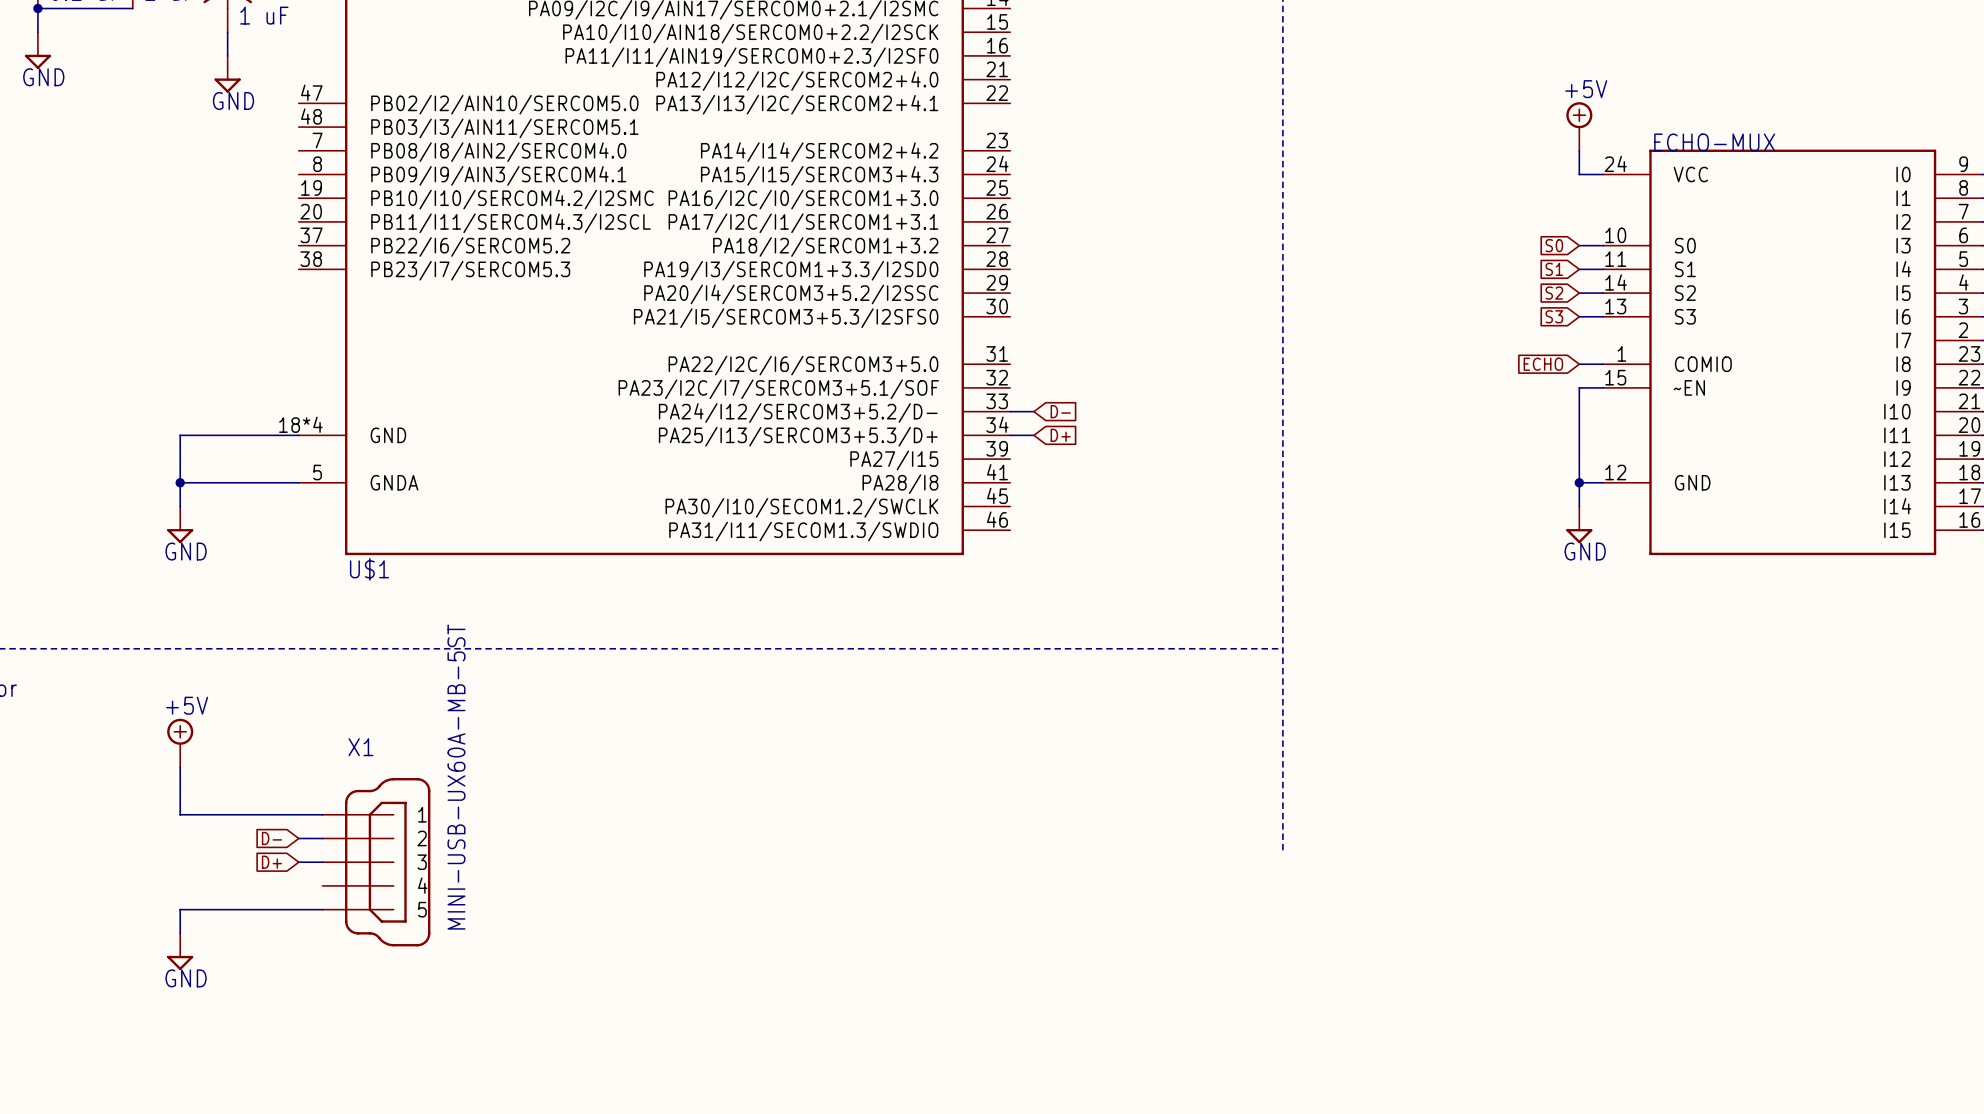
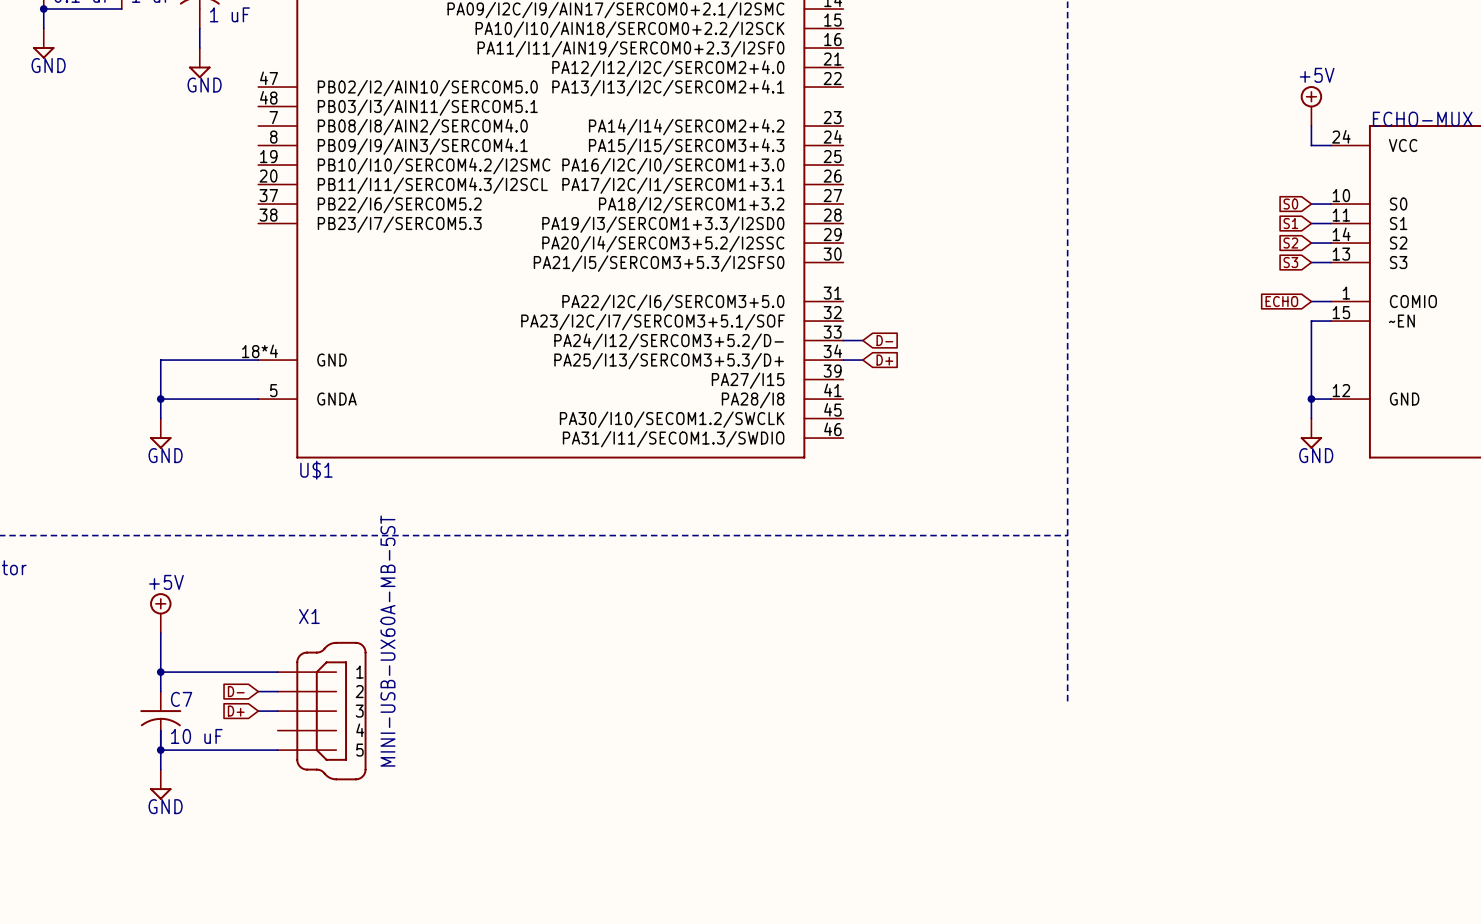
wire: none -> (160, 672) (160, 691)
junction: none -> (160, 672)
C7: none -> 10 uF (160, 720)
wire: none -> (160, 730) (160, 750)
junction: none -> (160, 750)

